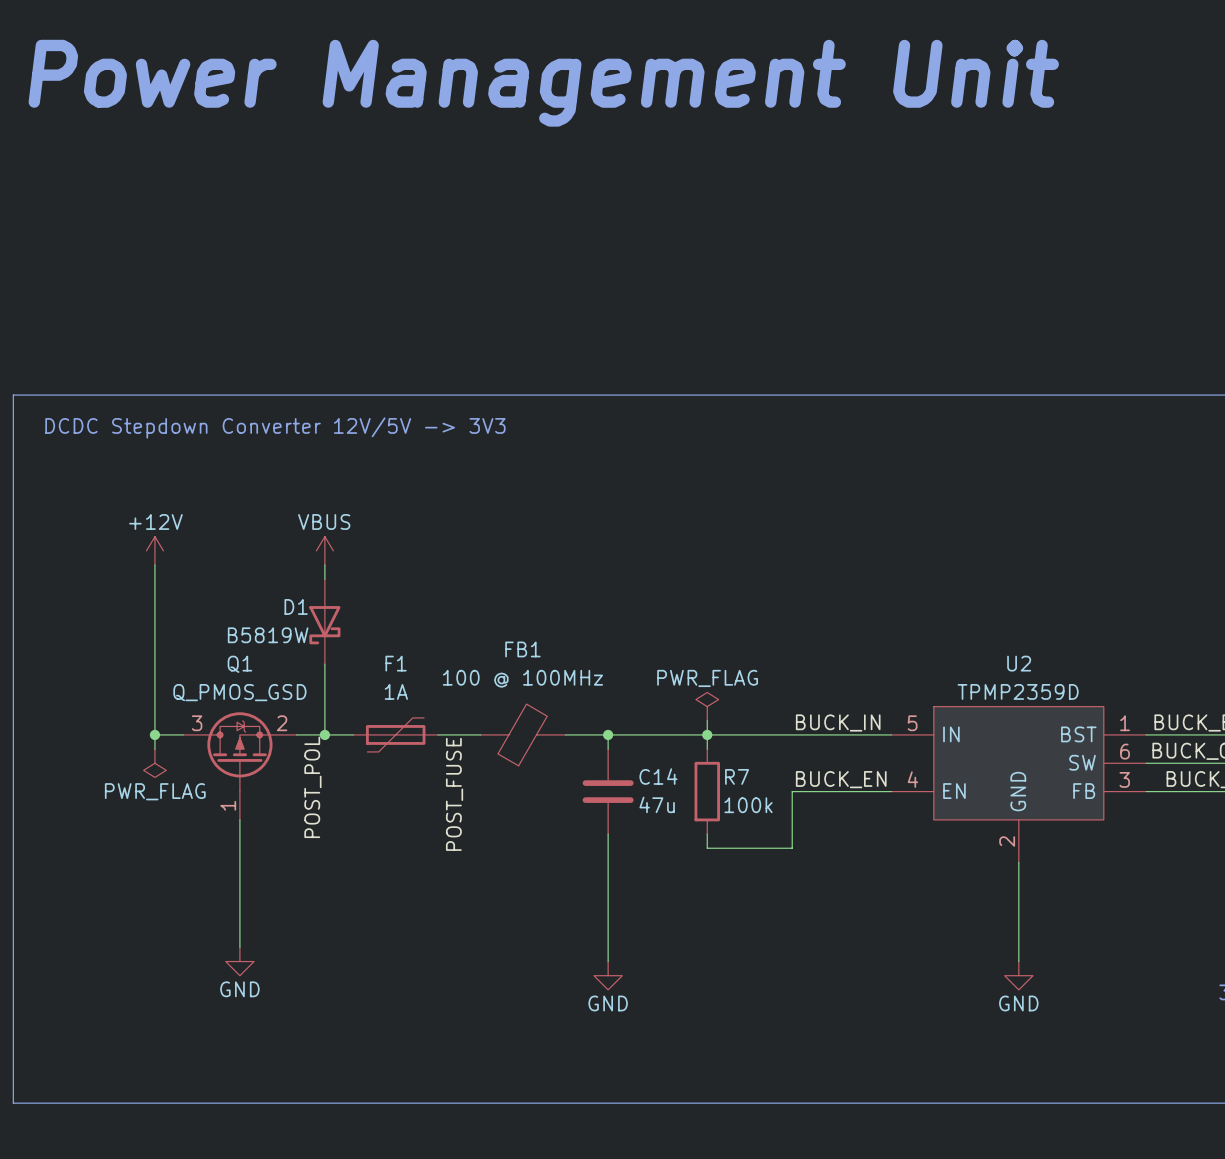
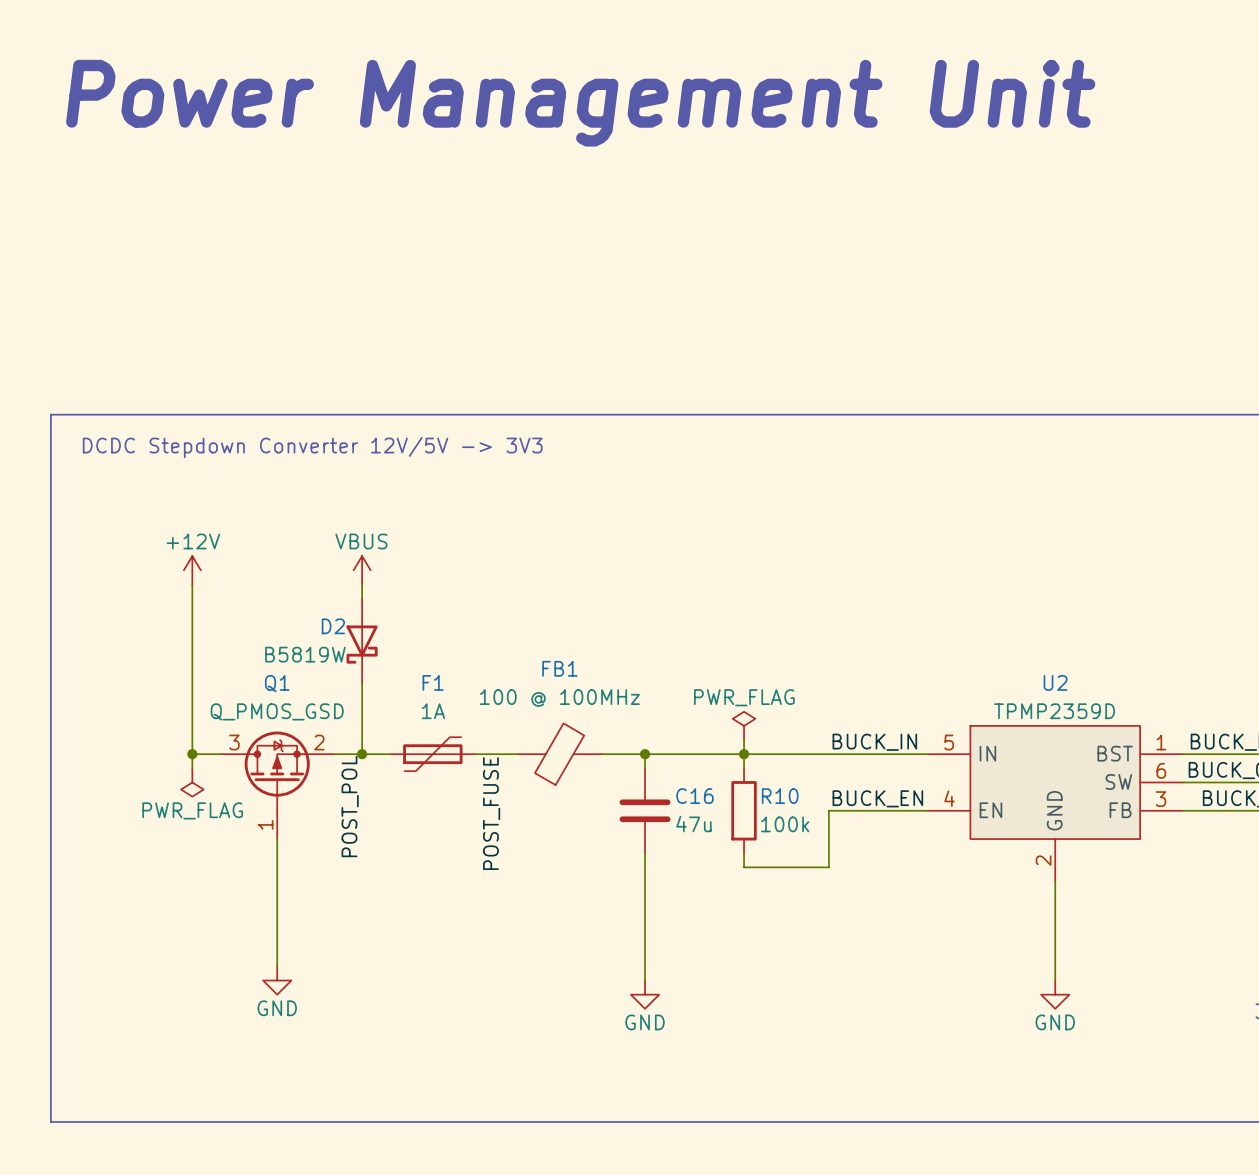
D1 name: D1 (296, 606) -> D2 (333, 626)
C14 name: C14 (658, 776) -> C16 (694, 796)
R7 name: R7 (737, 776) -> R10 (780, 796)

